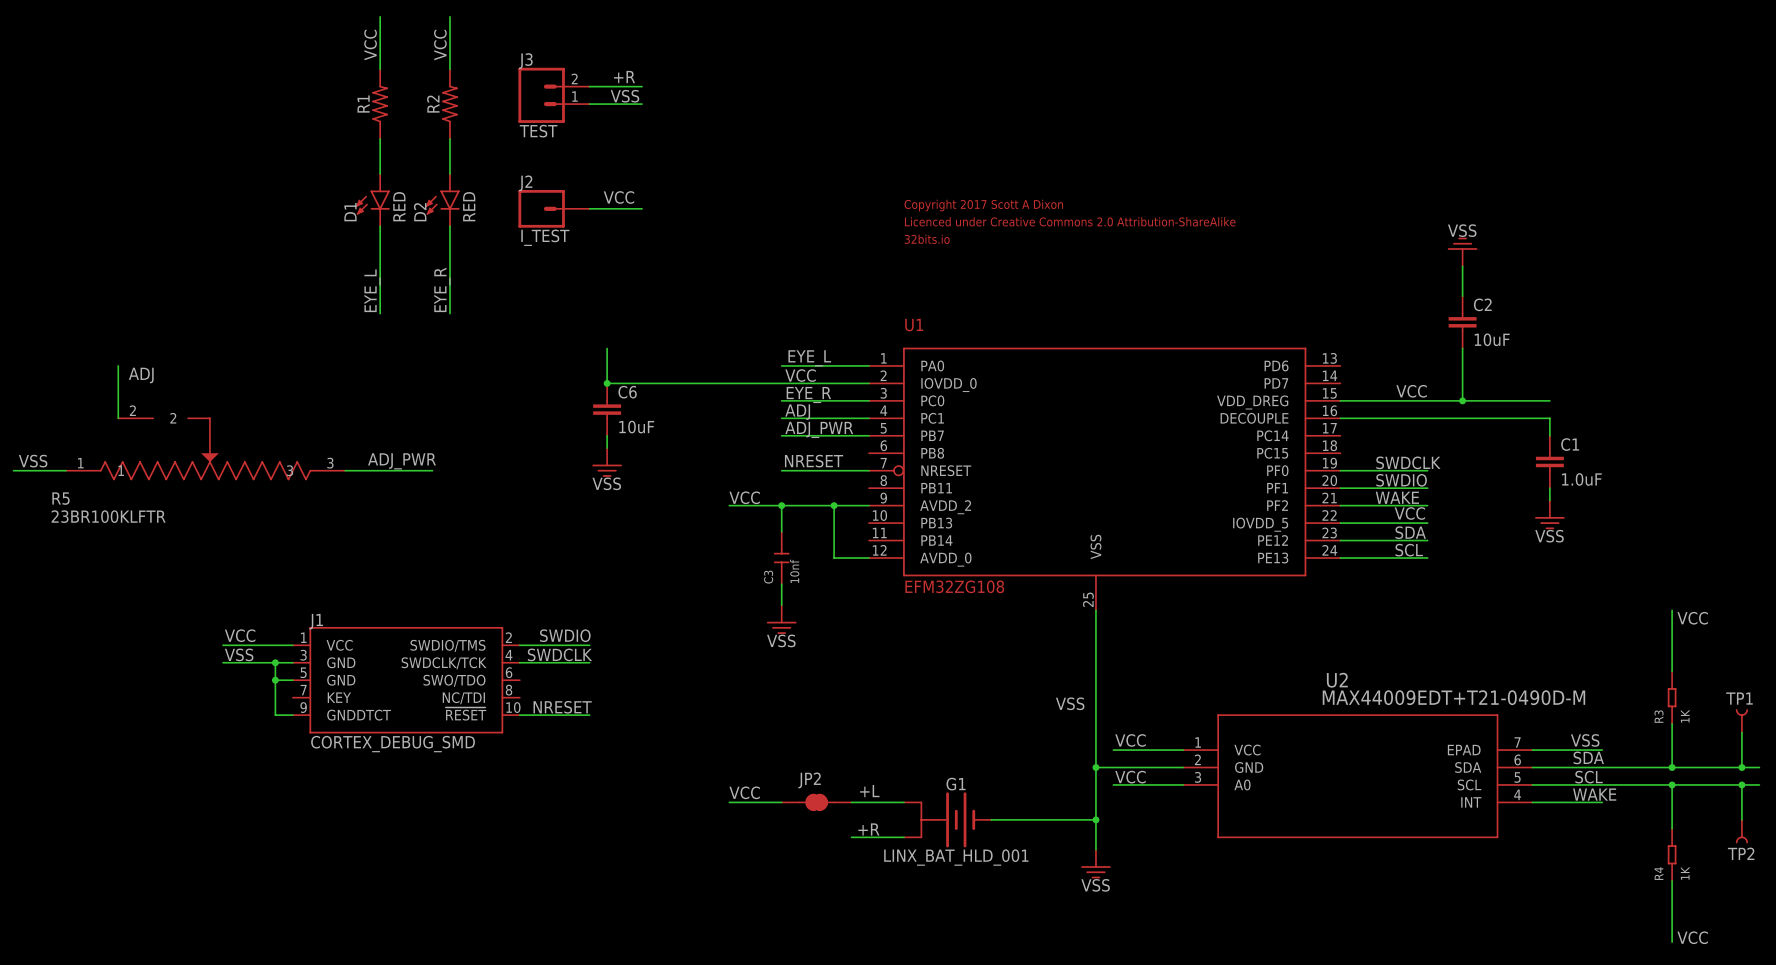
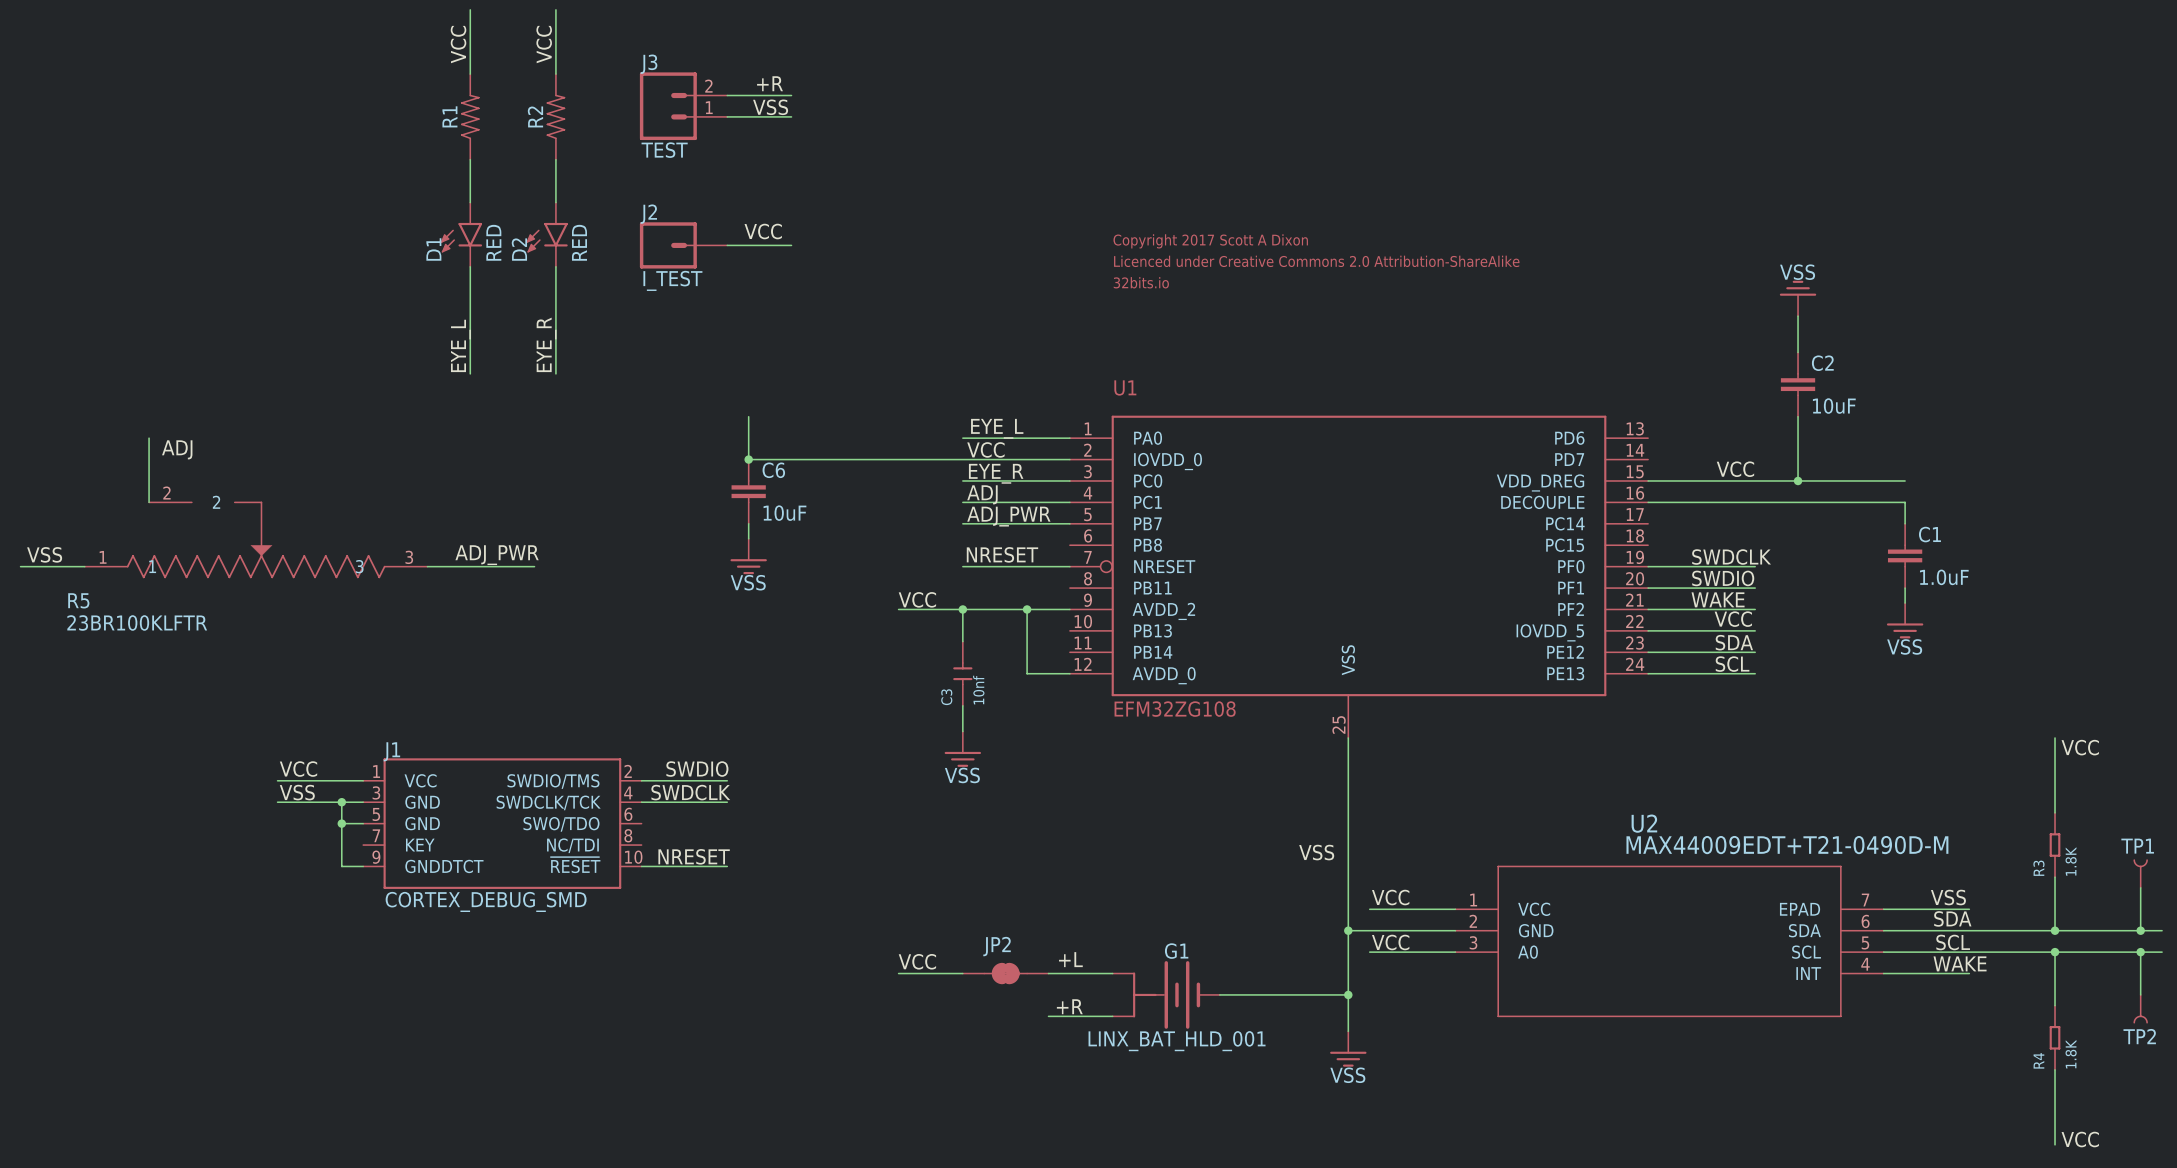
R3 value: 1K (1685, 716) -> 1.8K (2071, 861)
R4 value: 1K (1685, 873) -> 1.8K (2071, 1054)

